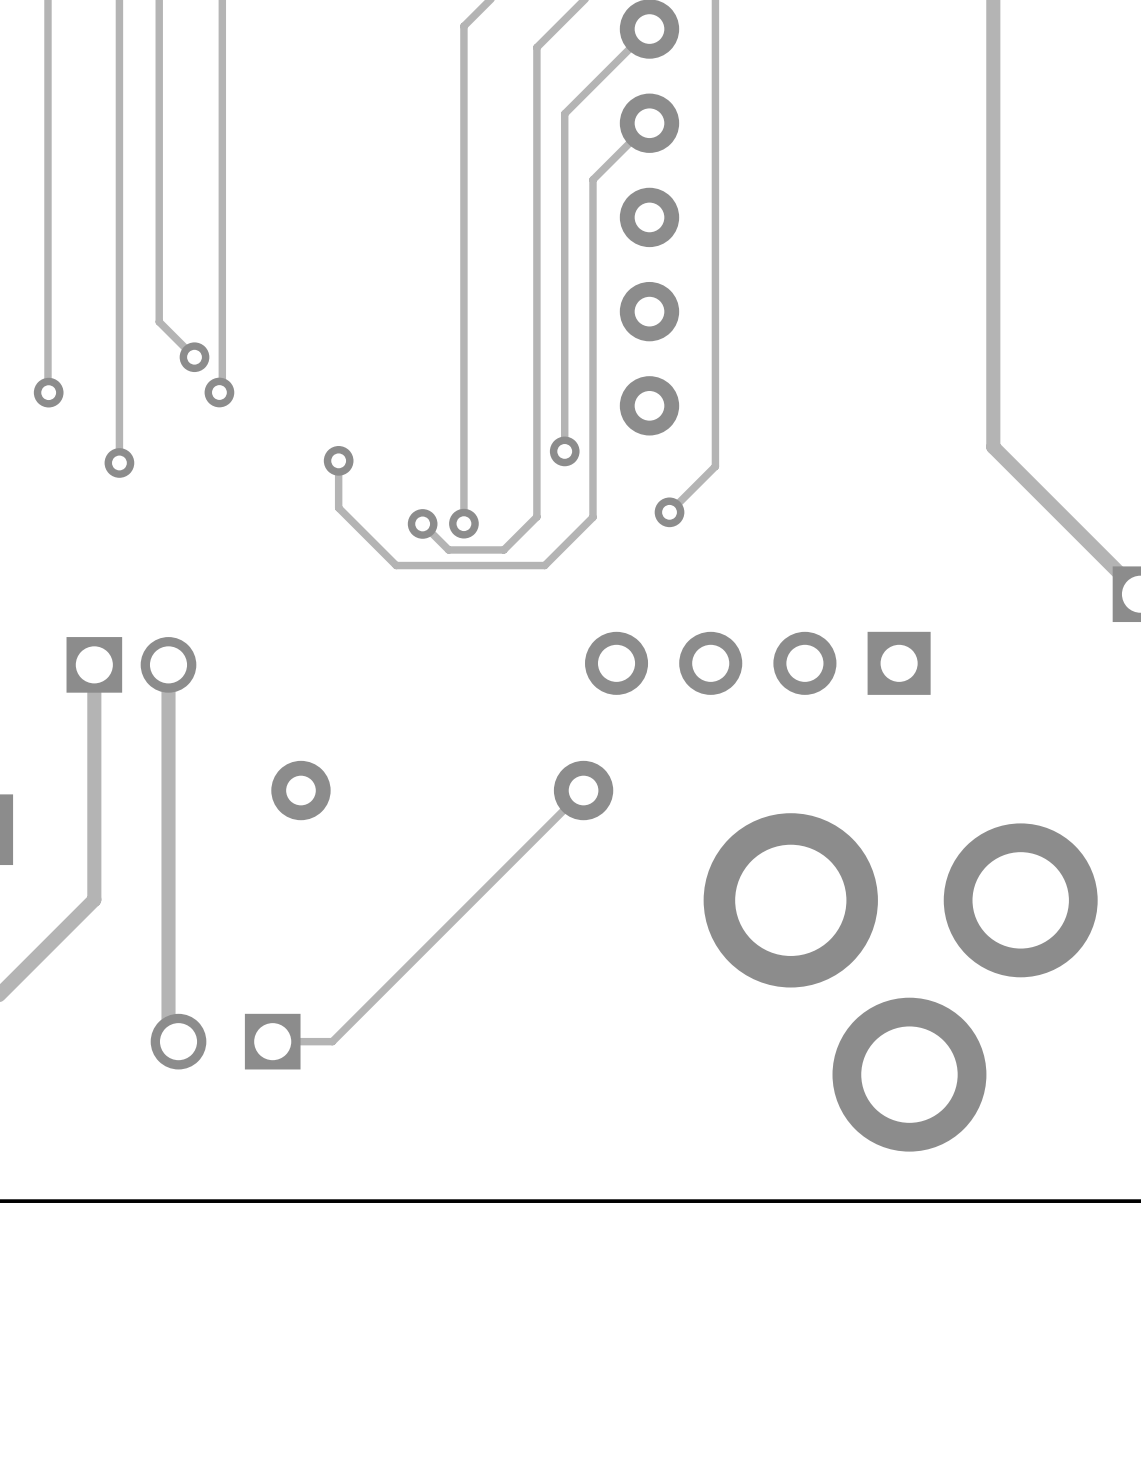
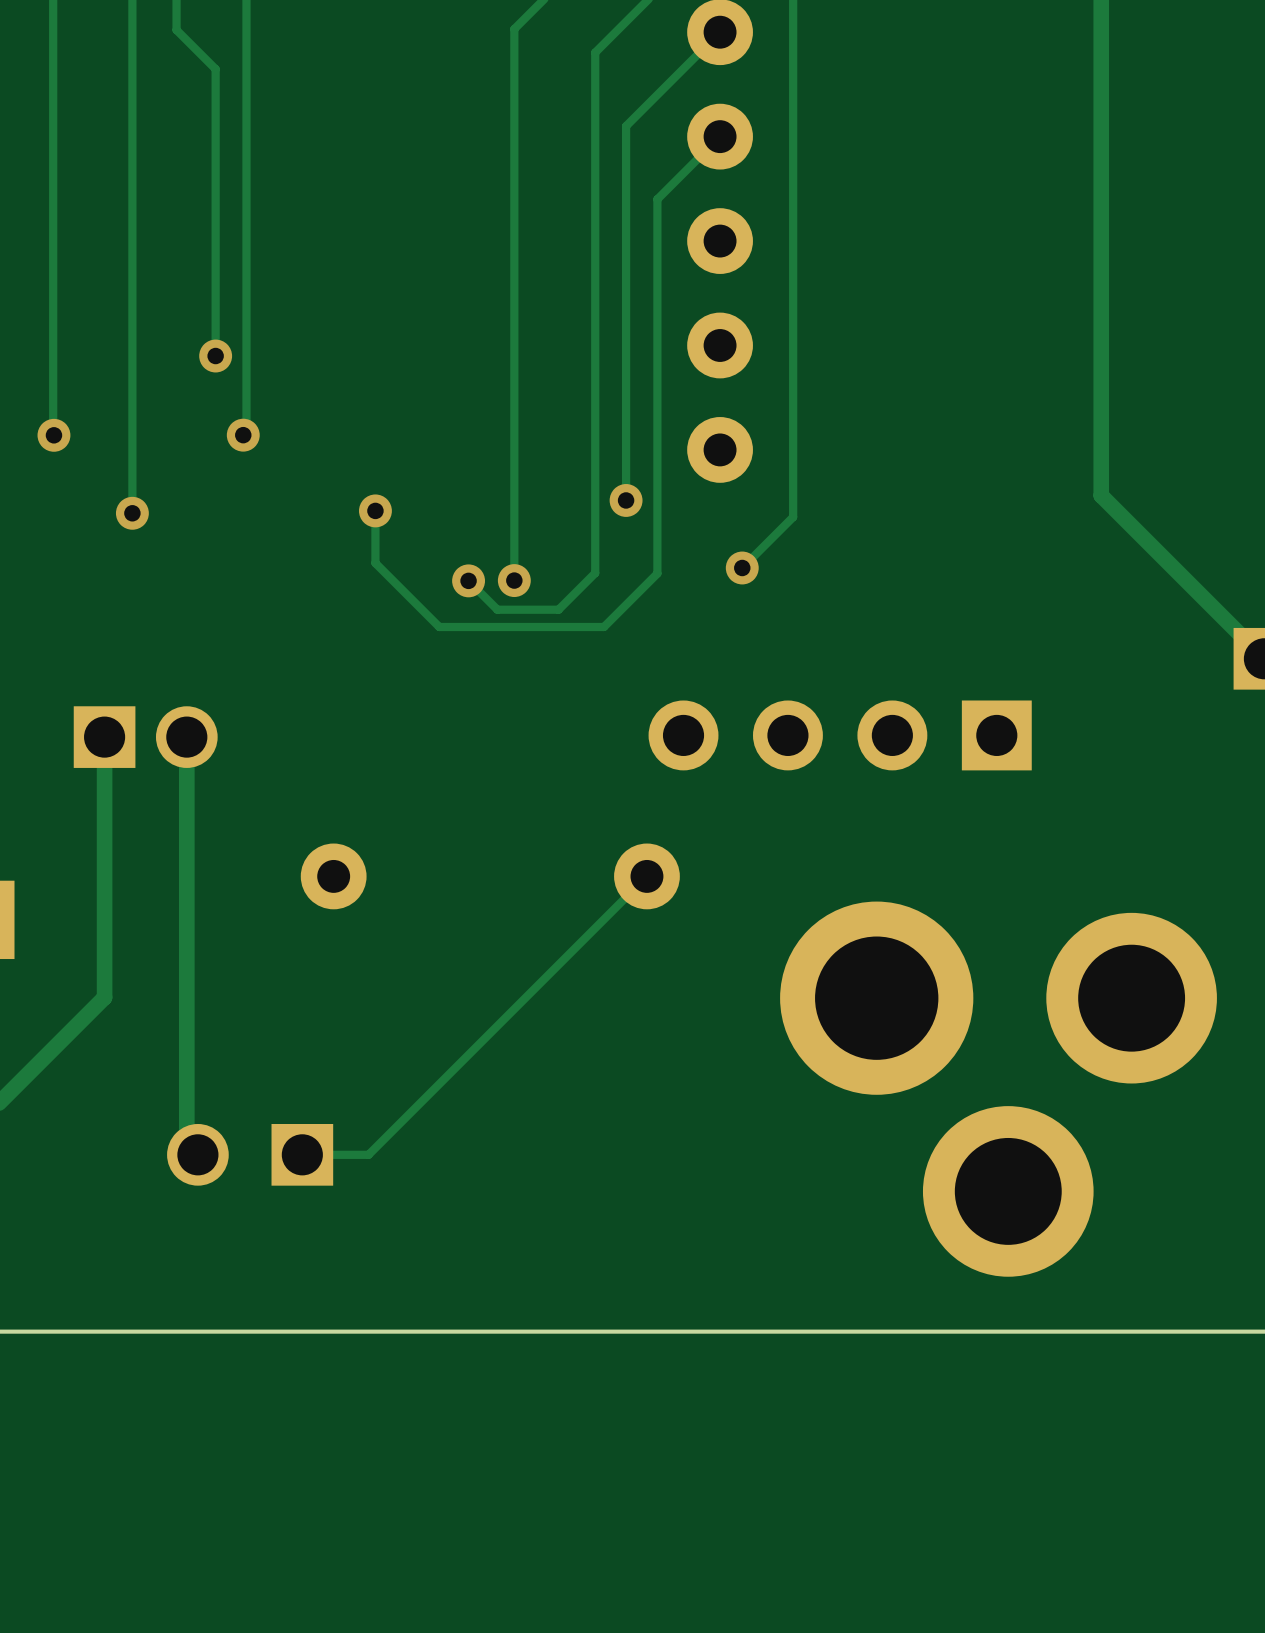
track: (159, 27) (159, 321) (194, 357) -> (176, 30) (215, 69) (215, 356)
via position: (194, 357) -> (215, 356)

